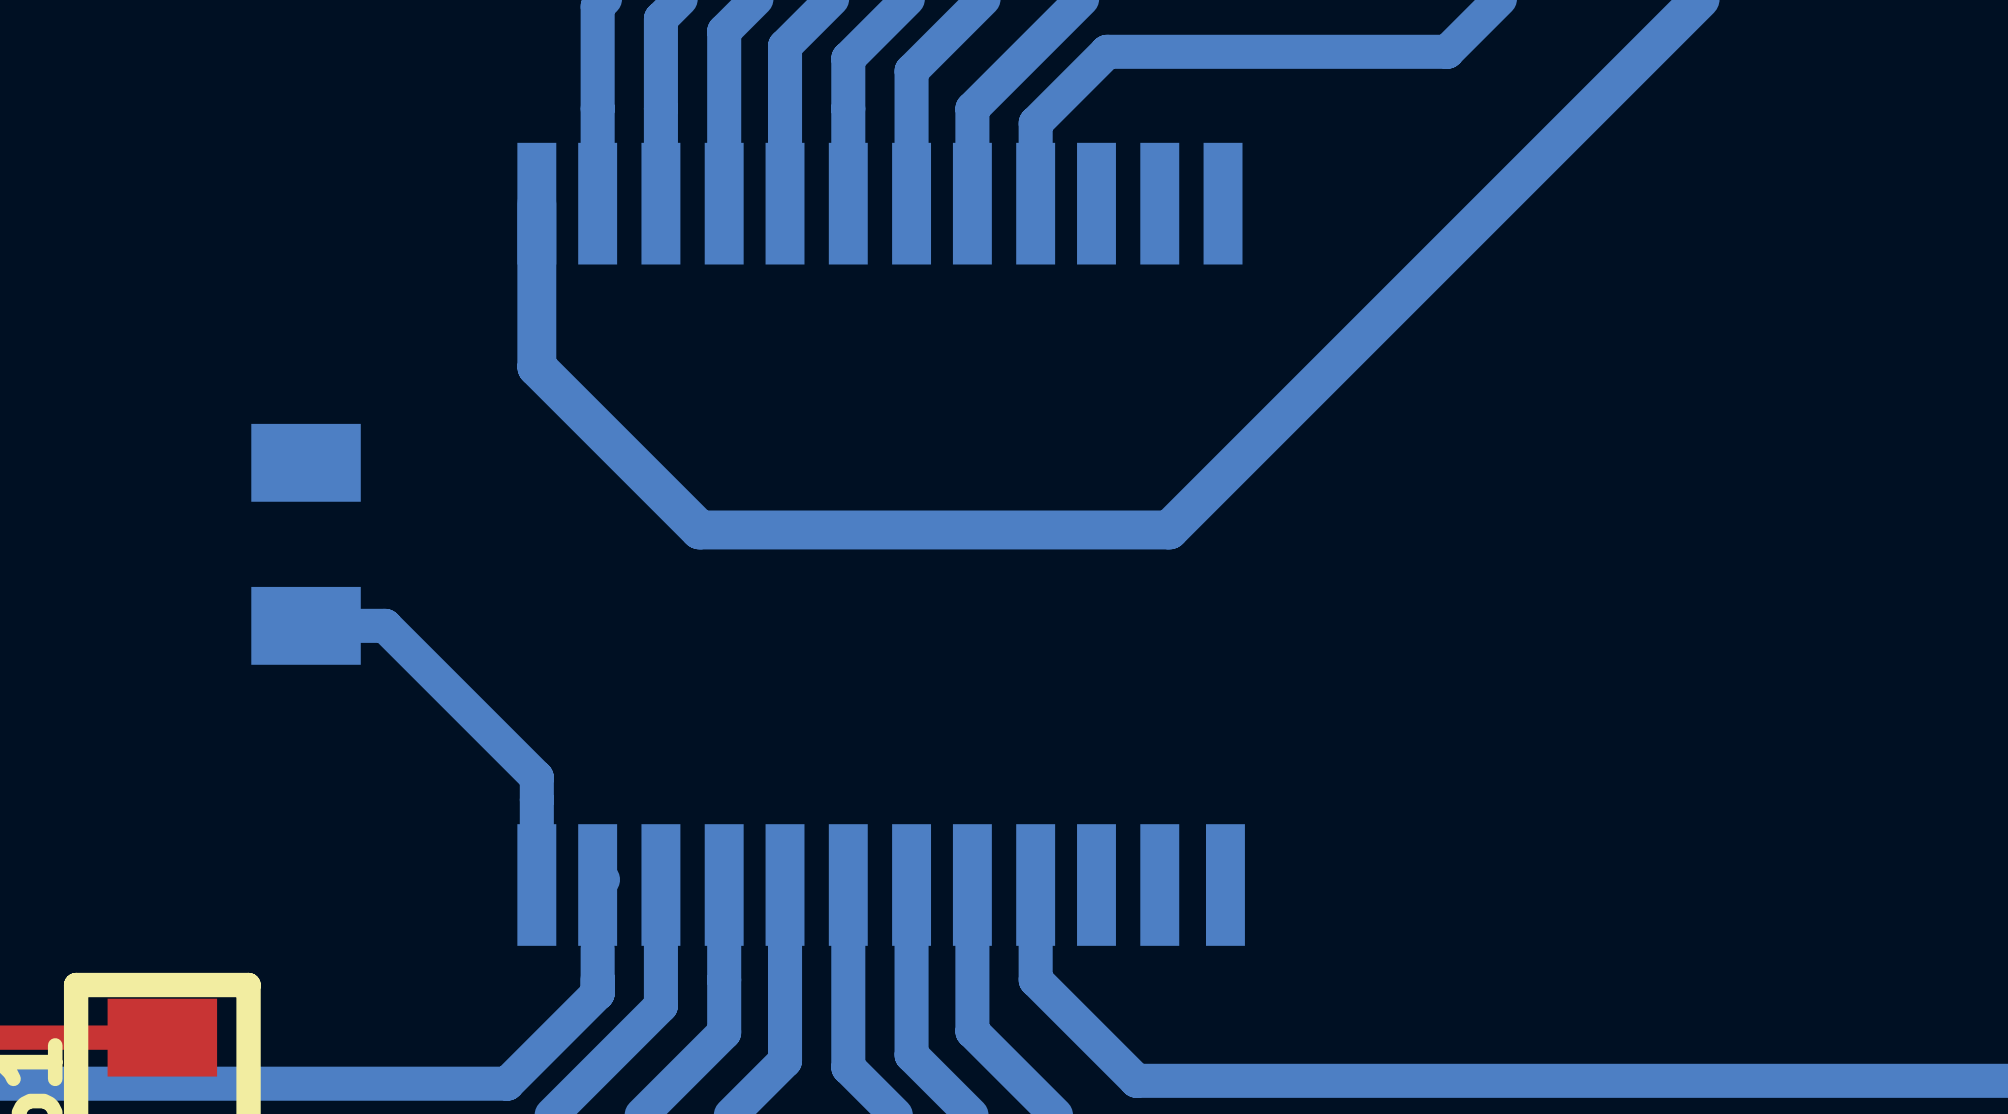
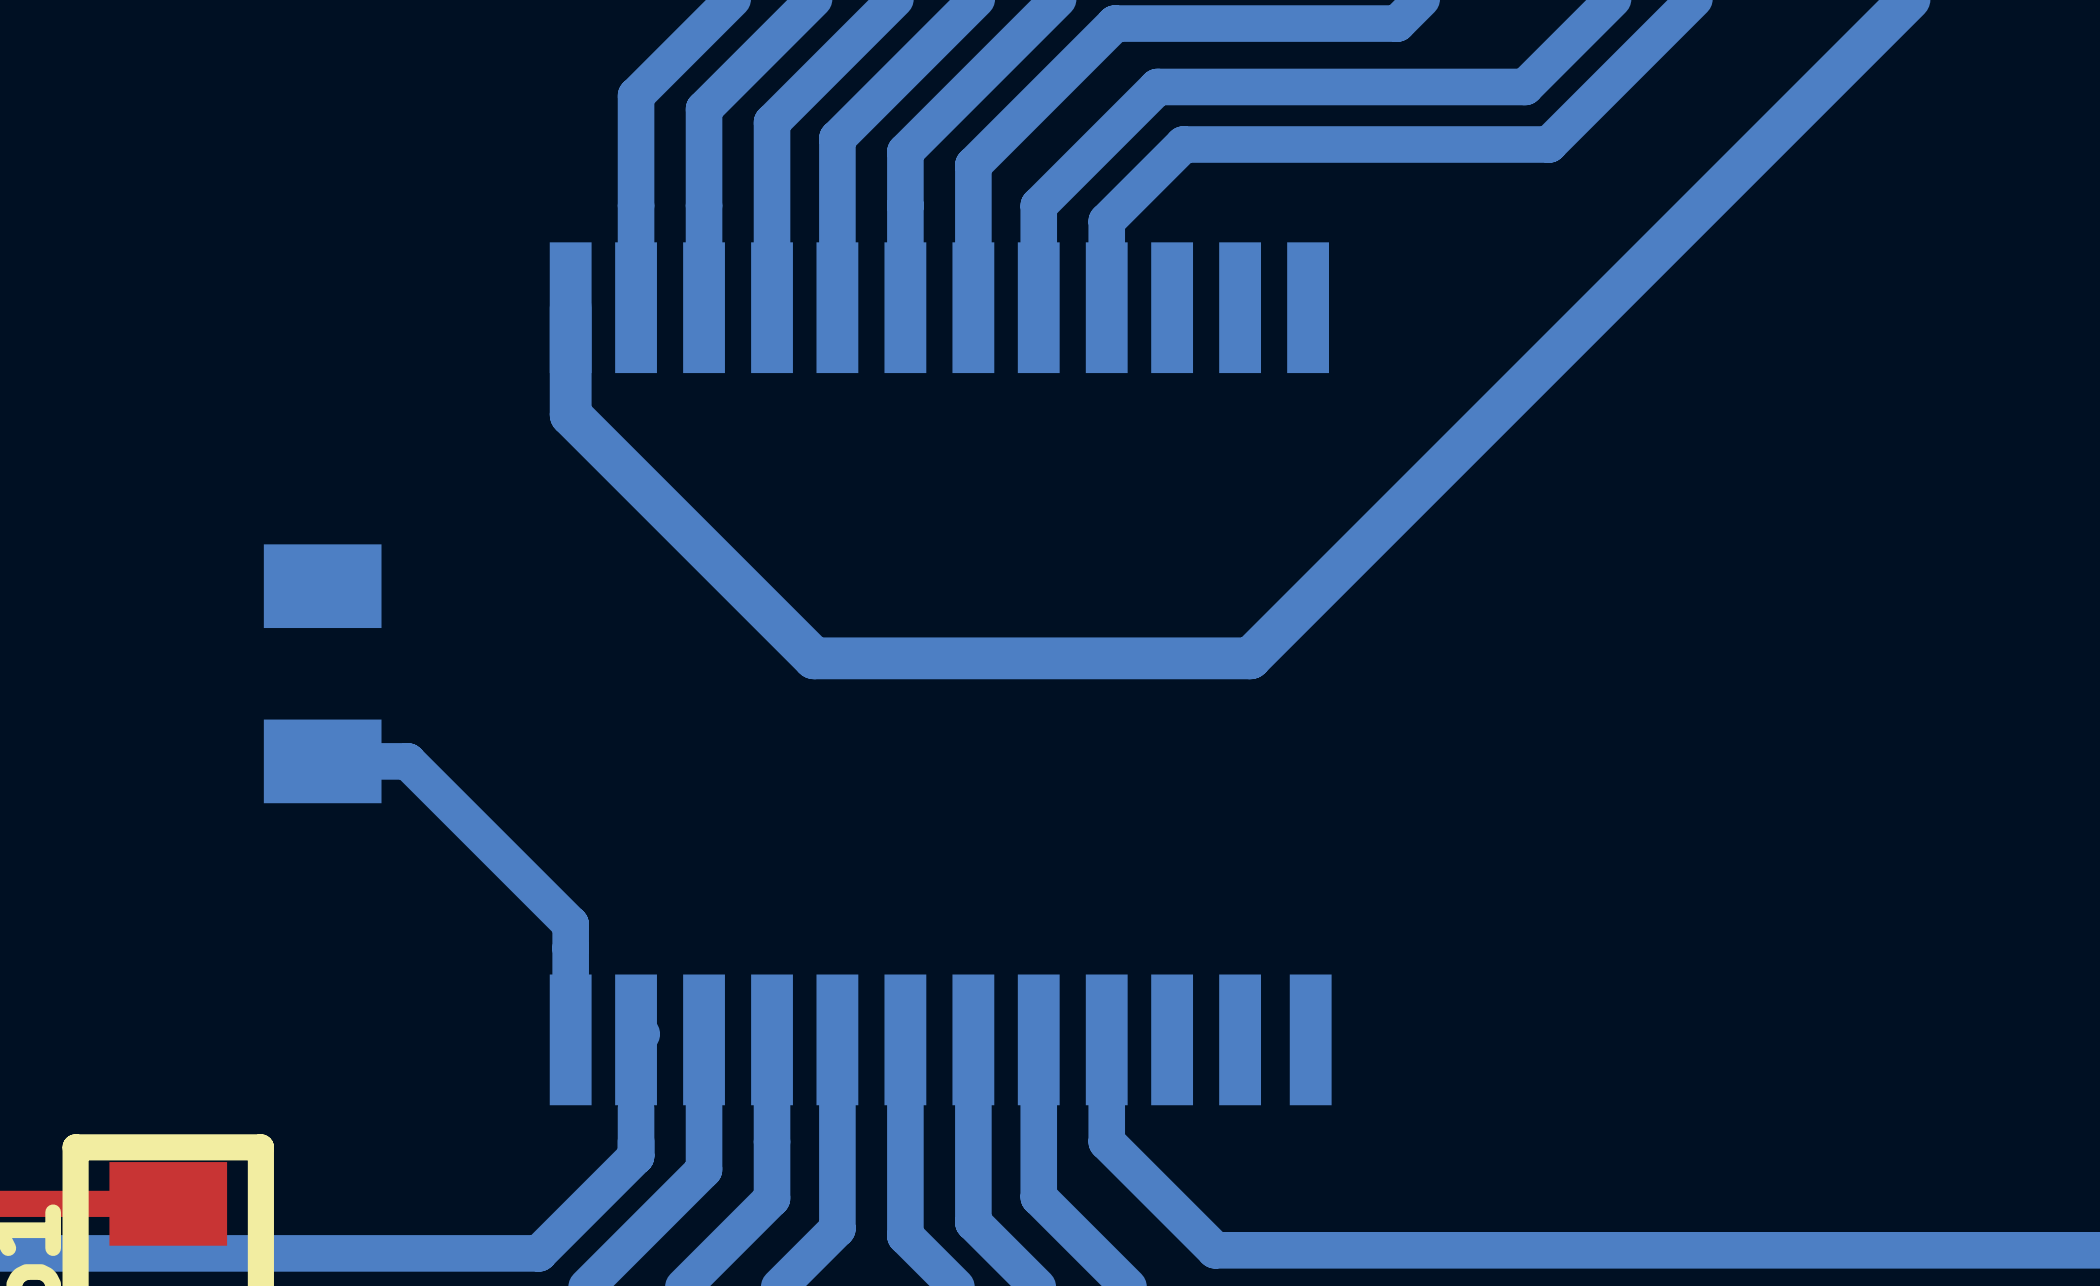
bottom track: (536, 303) (536, 367) (699, 529) (763, 529) -> (570, 414) (814, 658)

